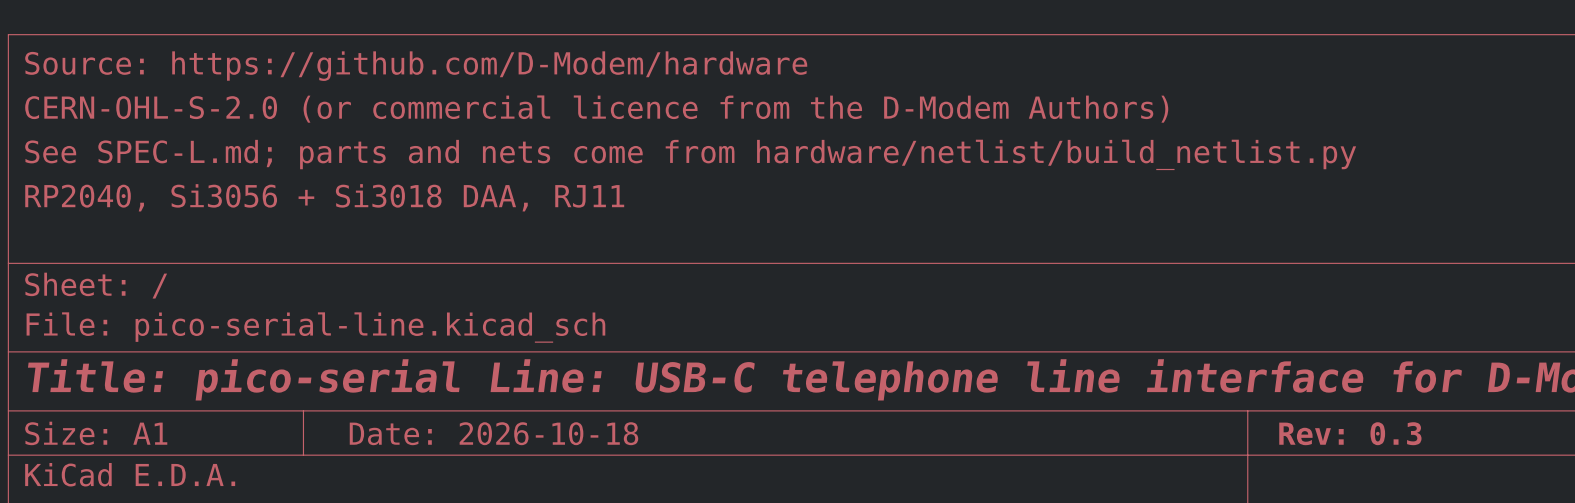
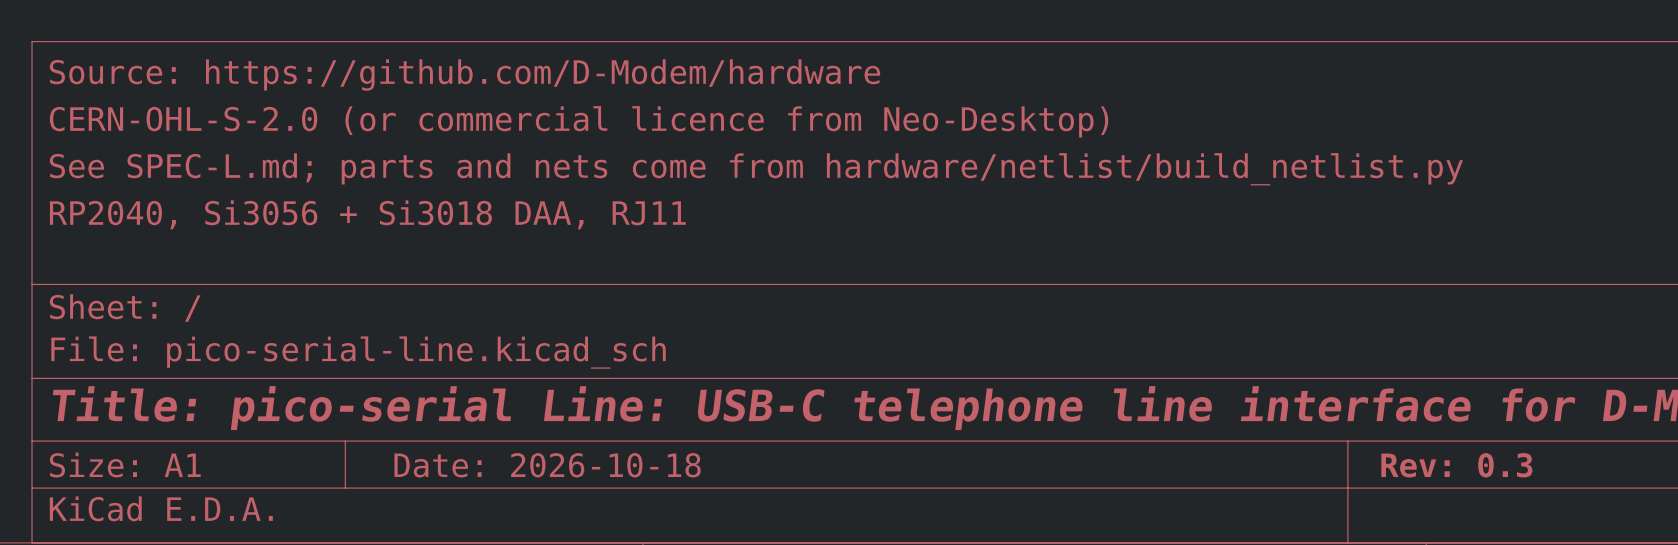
title block: CERN-OHL-S-2.0 (or commercial licence from the D-Modem Authors) (596, 109) -> CERN-OHL-S-2.0 (or commercial licence from Neo-Desktop) (579, 121)

